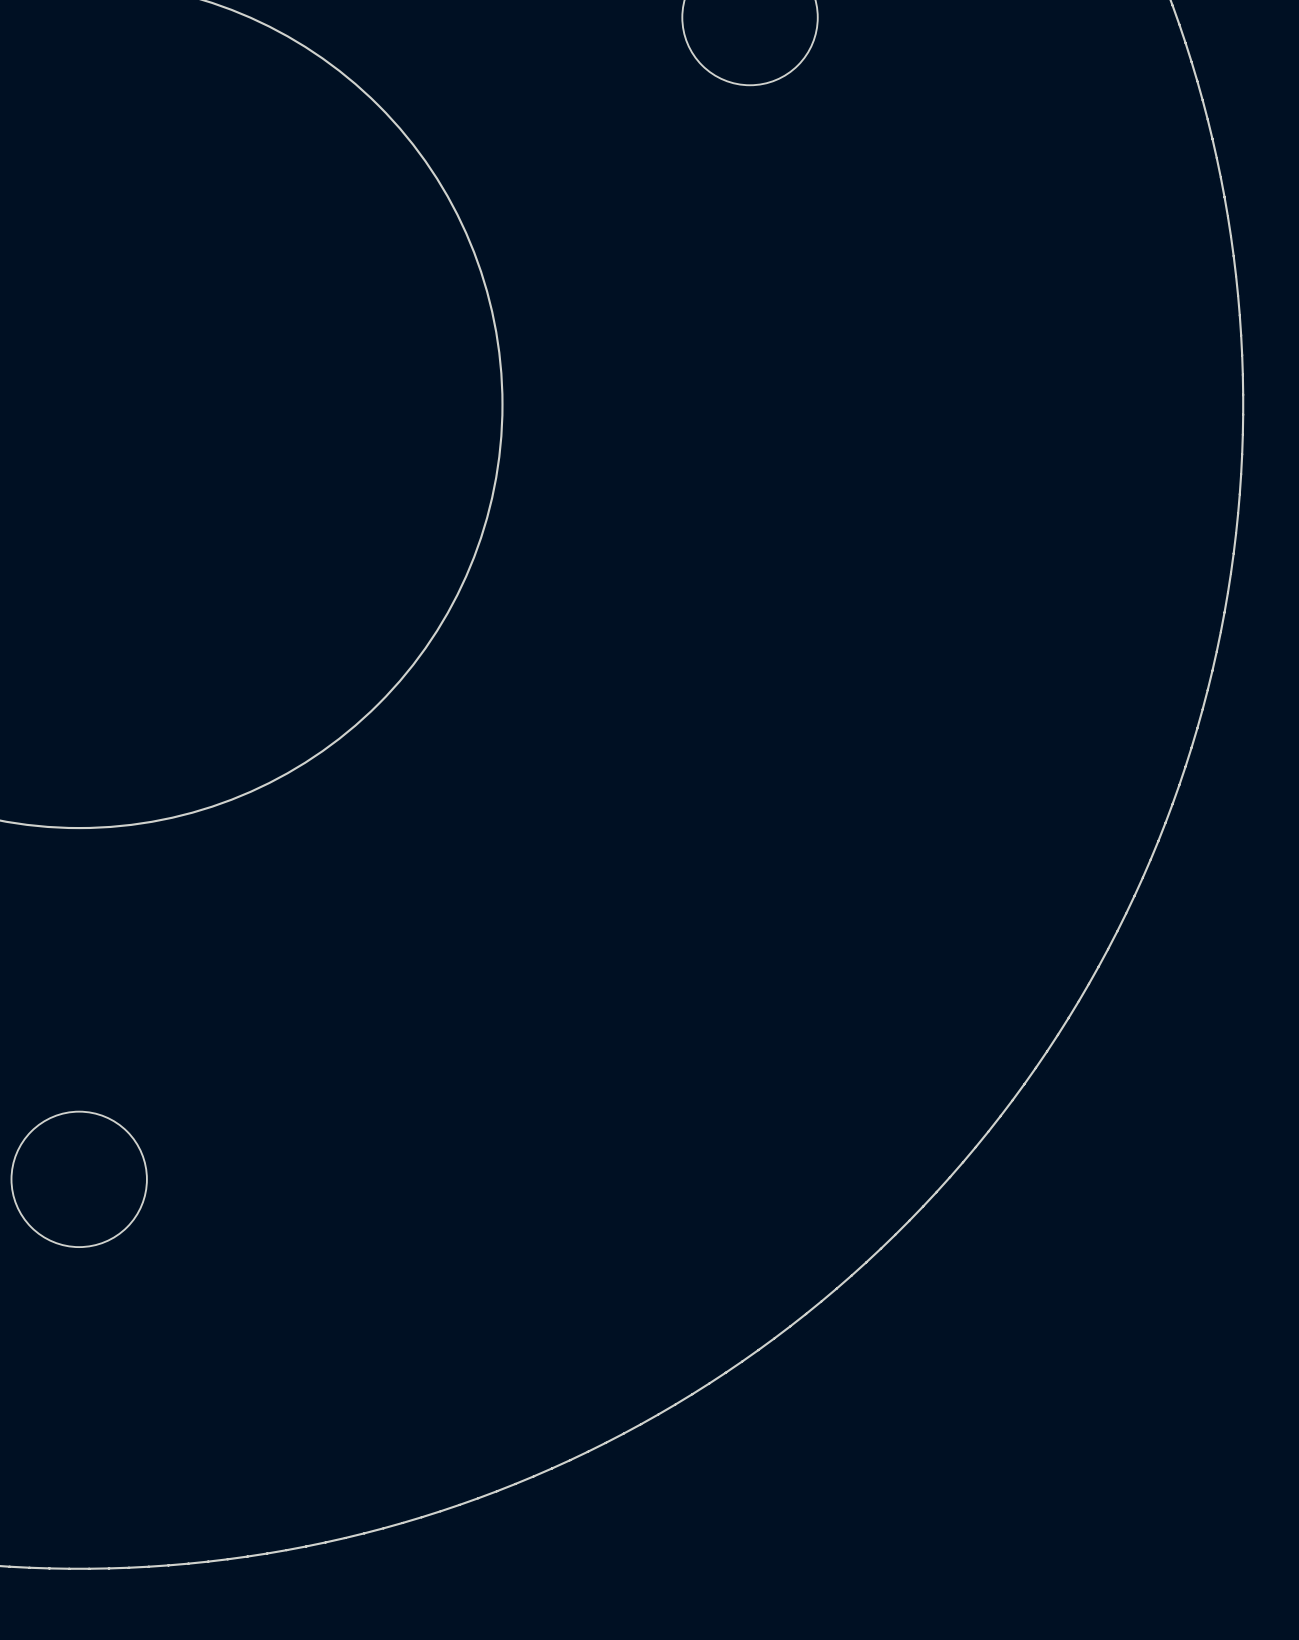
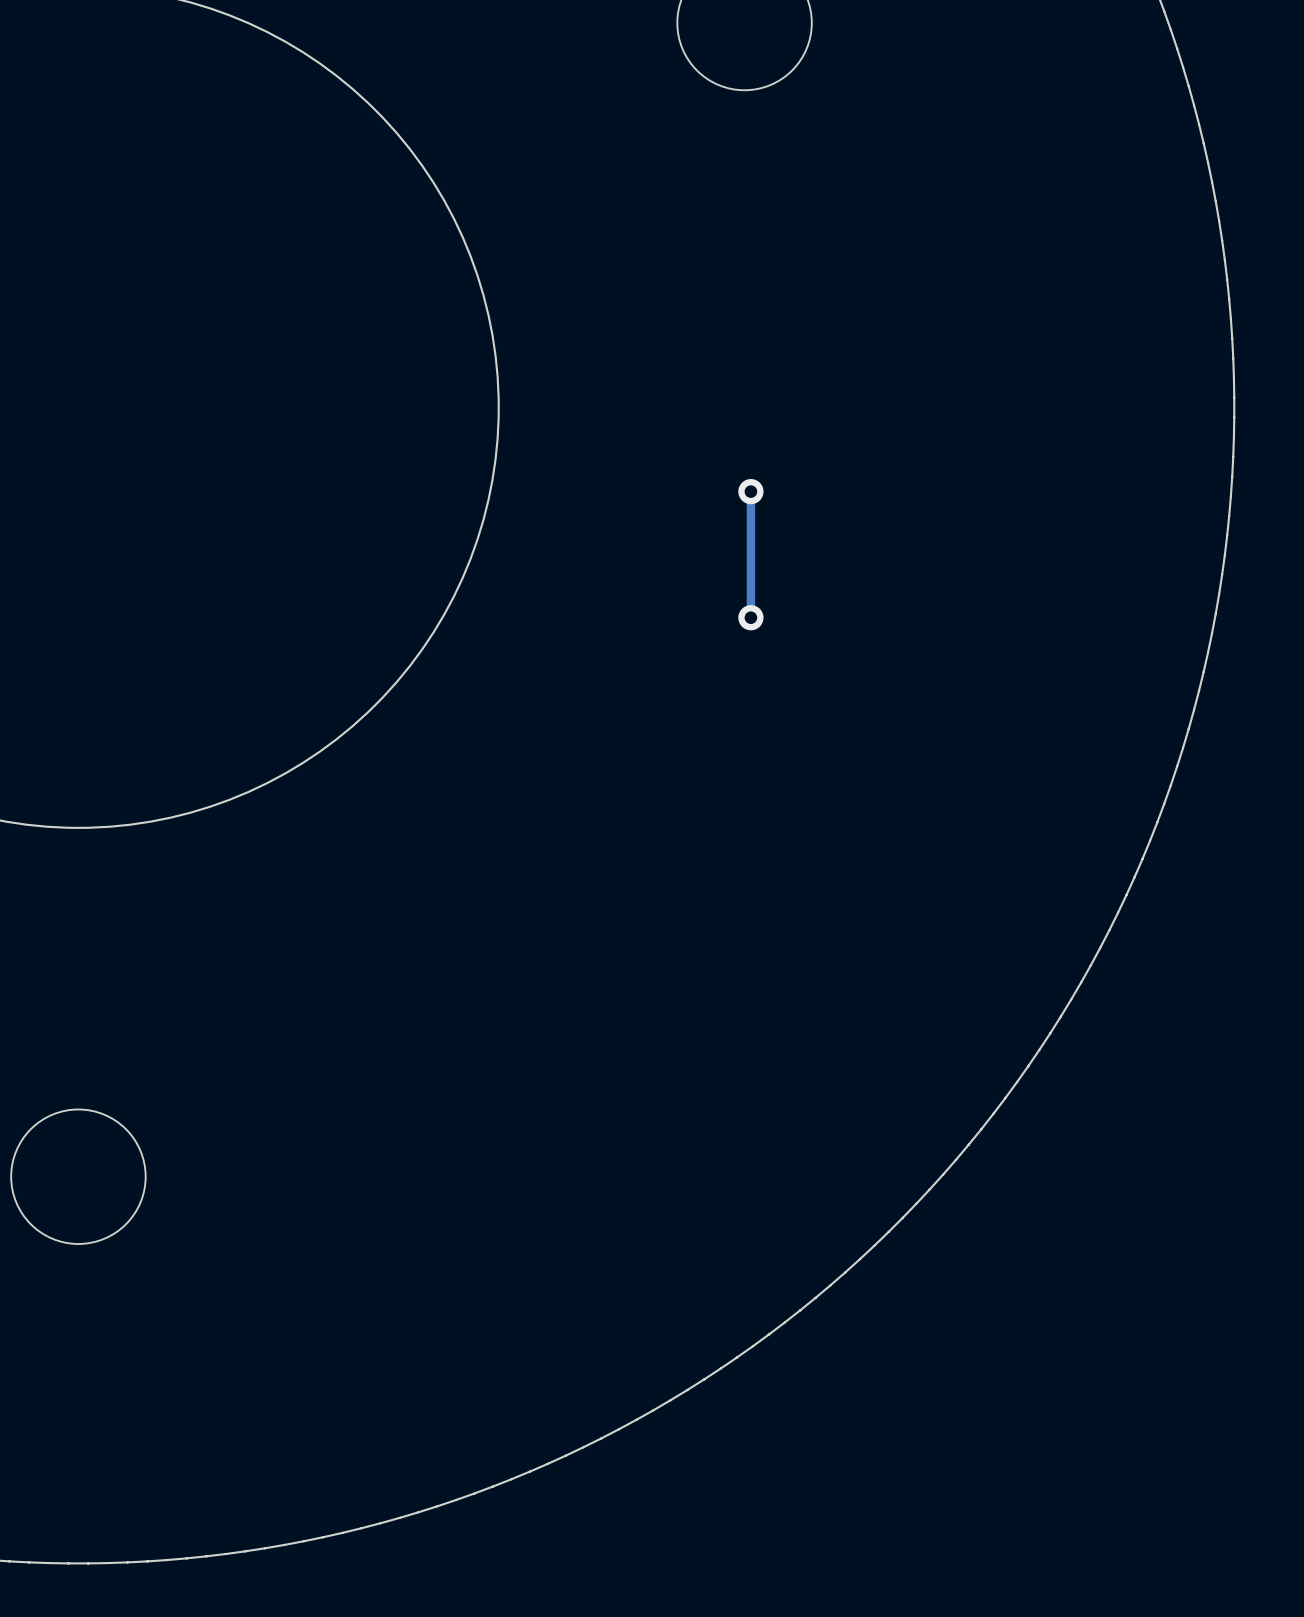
track: none -> (750, 491) (750, 617)
via: none -> (750, 491)
via: none -> (750, 617)

